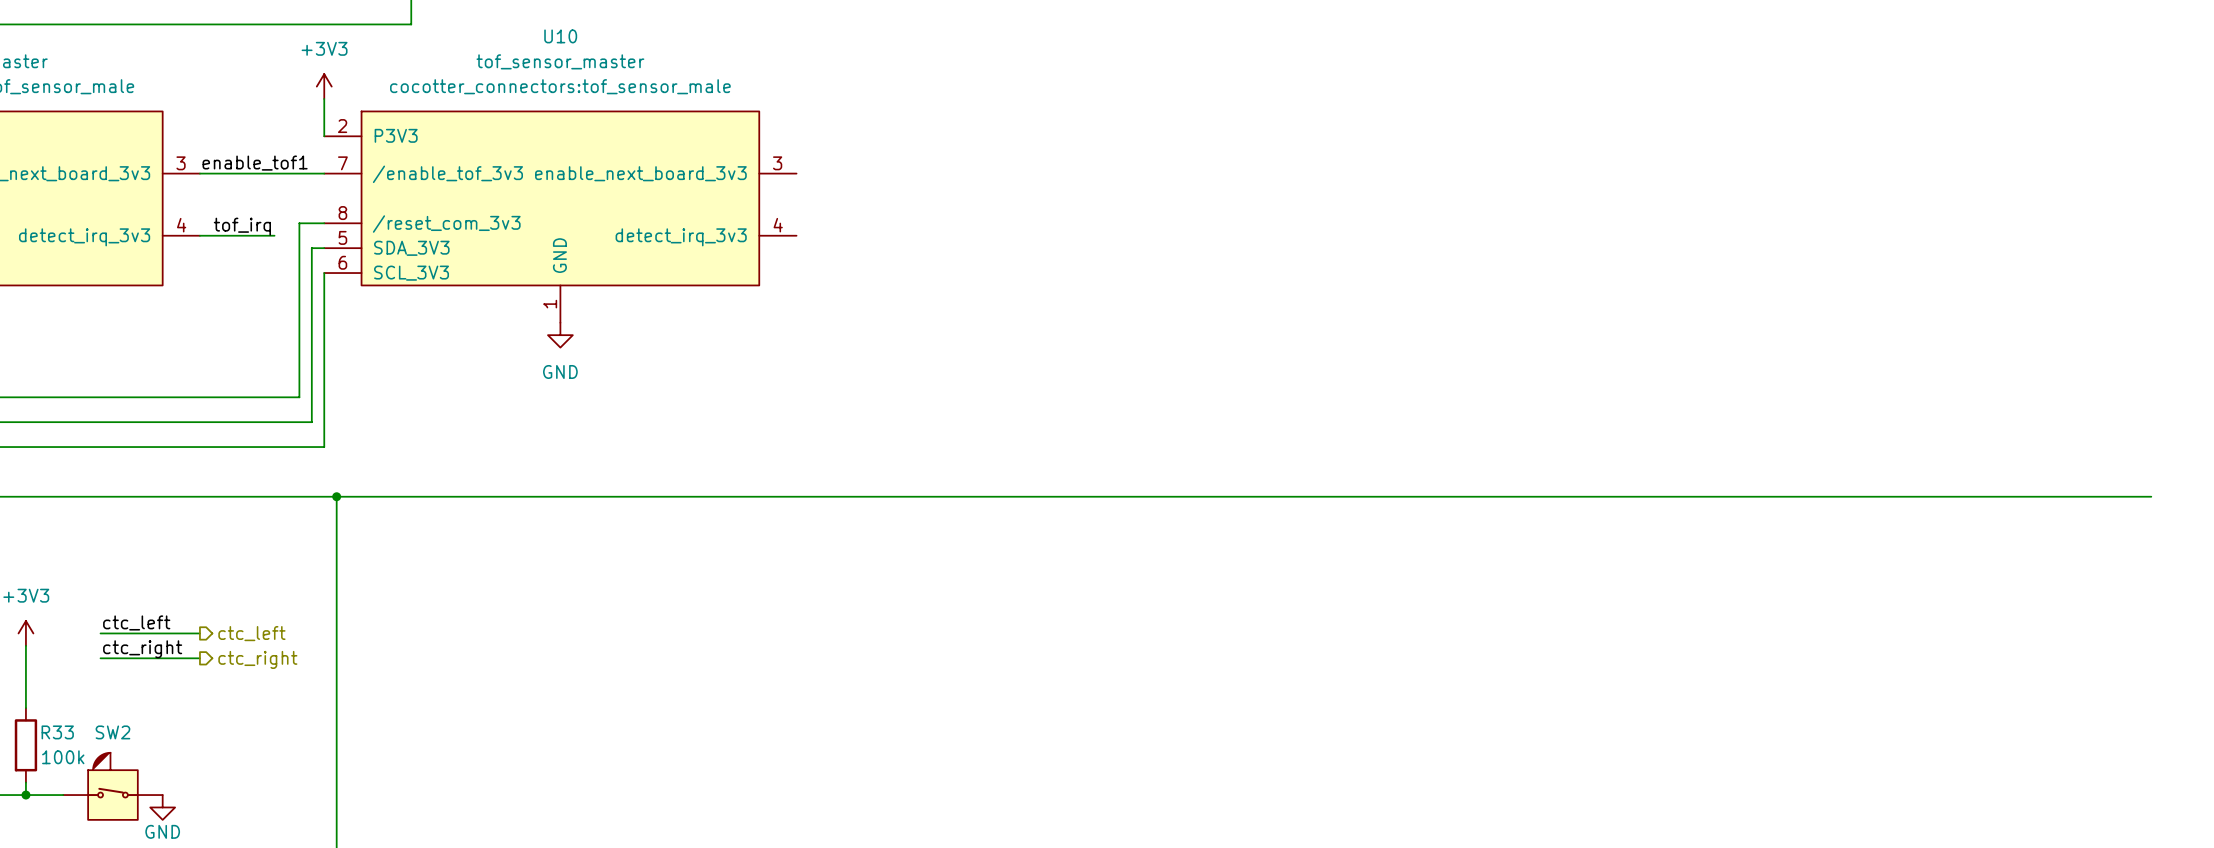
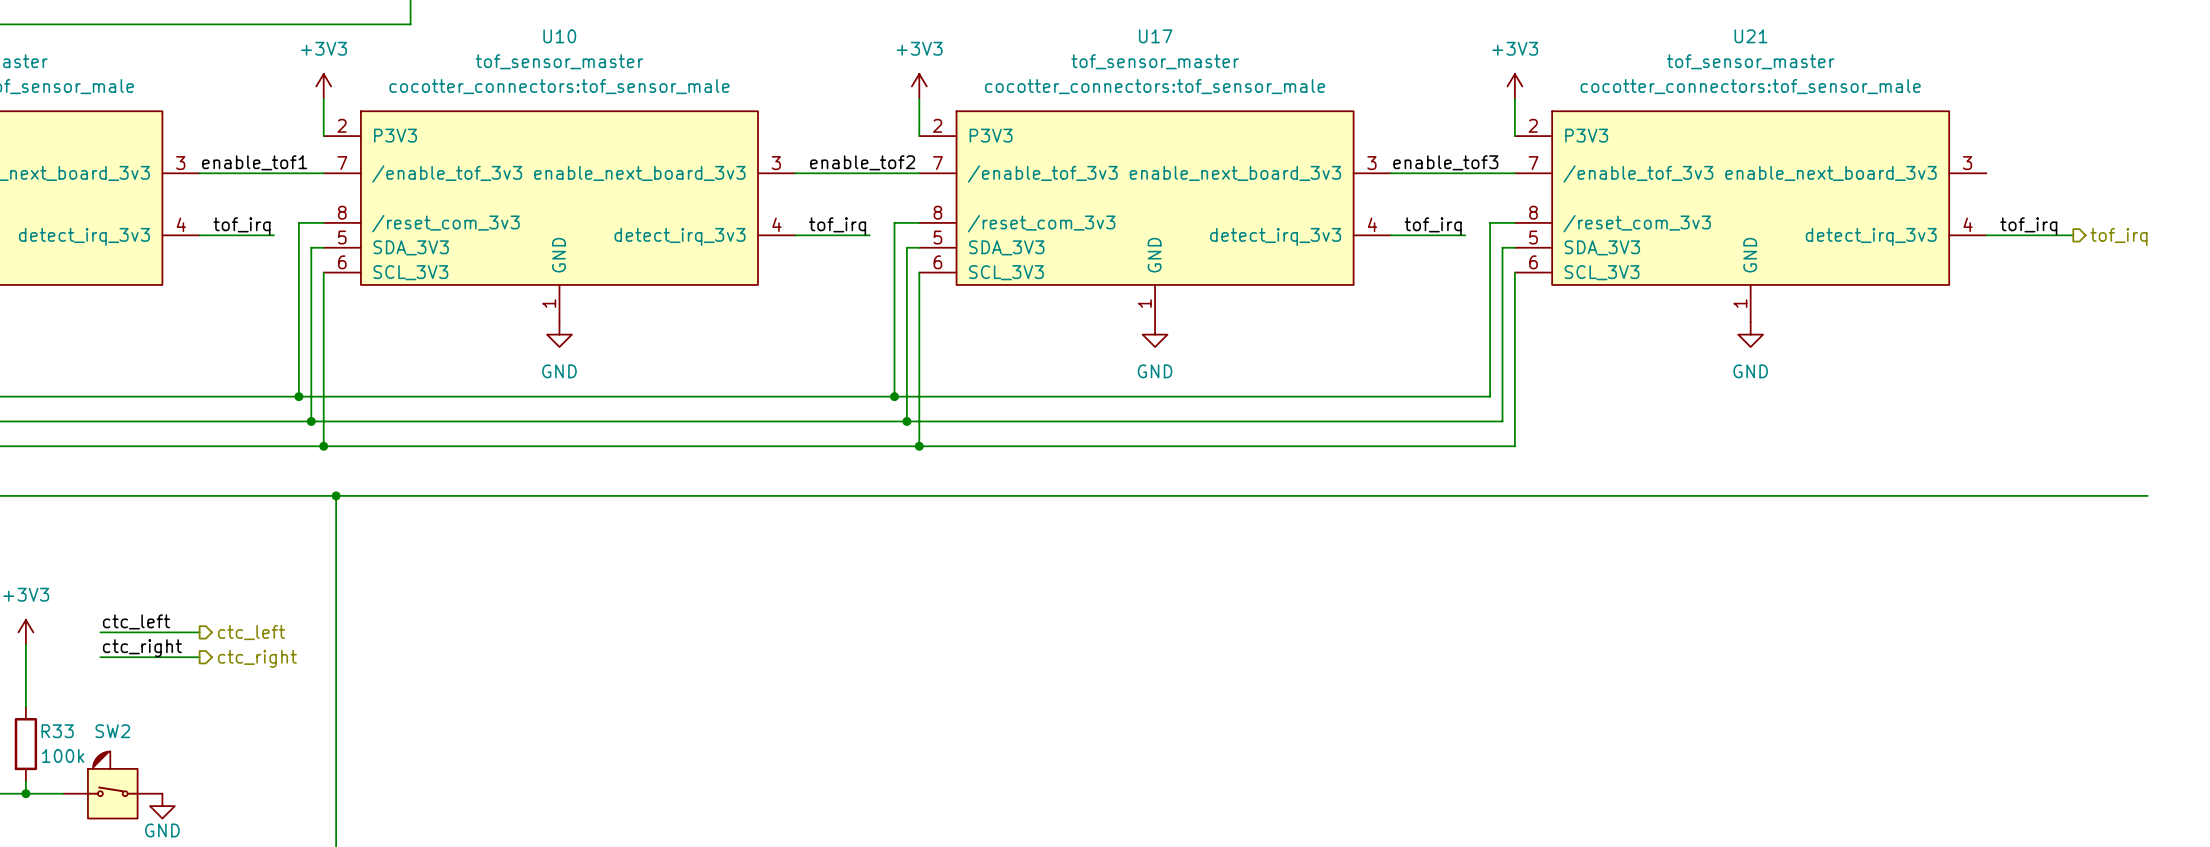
power symbol: none -> +3V3 (919, 86)
power symbol: none -> +3V3 (1514, 86)
wire: none -> (919, 98) (919, 136)
wire: none -> (1514, 98) (1514, 136)
label: none -> enable_tof2 (862, 162)
label: none -> enable_tof3 (1445, 162)
wire: none -> (795, 173) (919, 173)
wire: none -> (1390, 173) (1514, 173)
U17: none -> tof_sensor_master (1155, 216)
U21: none -> tof_sensor_master (1750, 216)
wire: none -> (919, 222) (894, 222) (894, 396)
wire: none -> (1514, 222) (1490, 222) (1490, 396) (298, 396)
label: none -> tof_irq (837, 226)
label: none -> tof_irq (1433, 226)
label: none -> tof_irq (2028, 226)
wire: none -> (795, 235) (869, 235)
wire: none -> (1390, 235) (1465, 235)
wire: none -> (1986, 235) (2073, 235)
hierarchical label: none -> tof_irq (2118, 236)
wire: none -> (919, 247) (906, 247) (906, 421)
wire: none -> (1514, 247) (1502, 247) (1502, 421) (311, 421)
wire: none -> (919, 272) (919, 446)
wire: none -> (1514, 272) (1514, 446) (323, 446)
power symbol: none -> GND (1155, 334)
power symbol: none -> GND (1750, 334)
junction: none -> (298, 396)
junction: none -> (894, 396)
junction: none -> (311, 421)
junction: none -> (906, 421)
junction: none -> (323, 446)
junction: none -> (919, 446)

